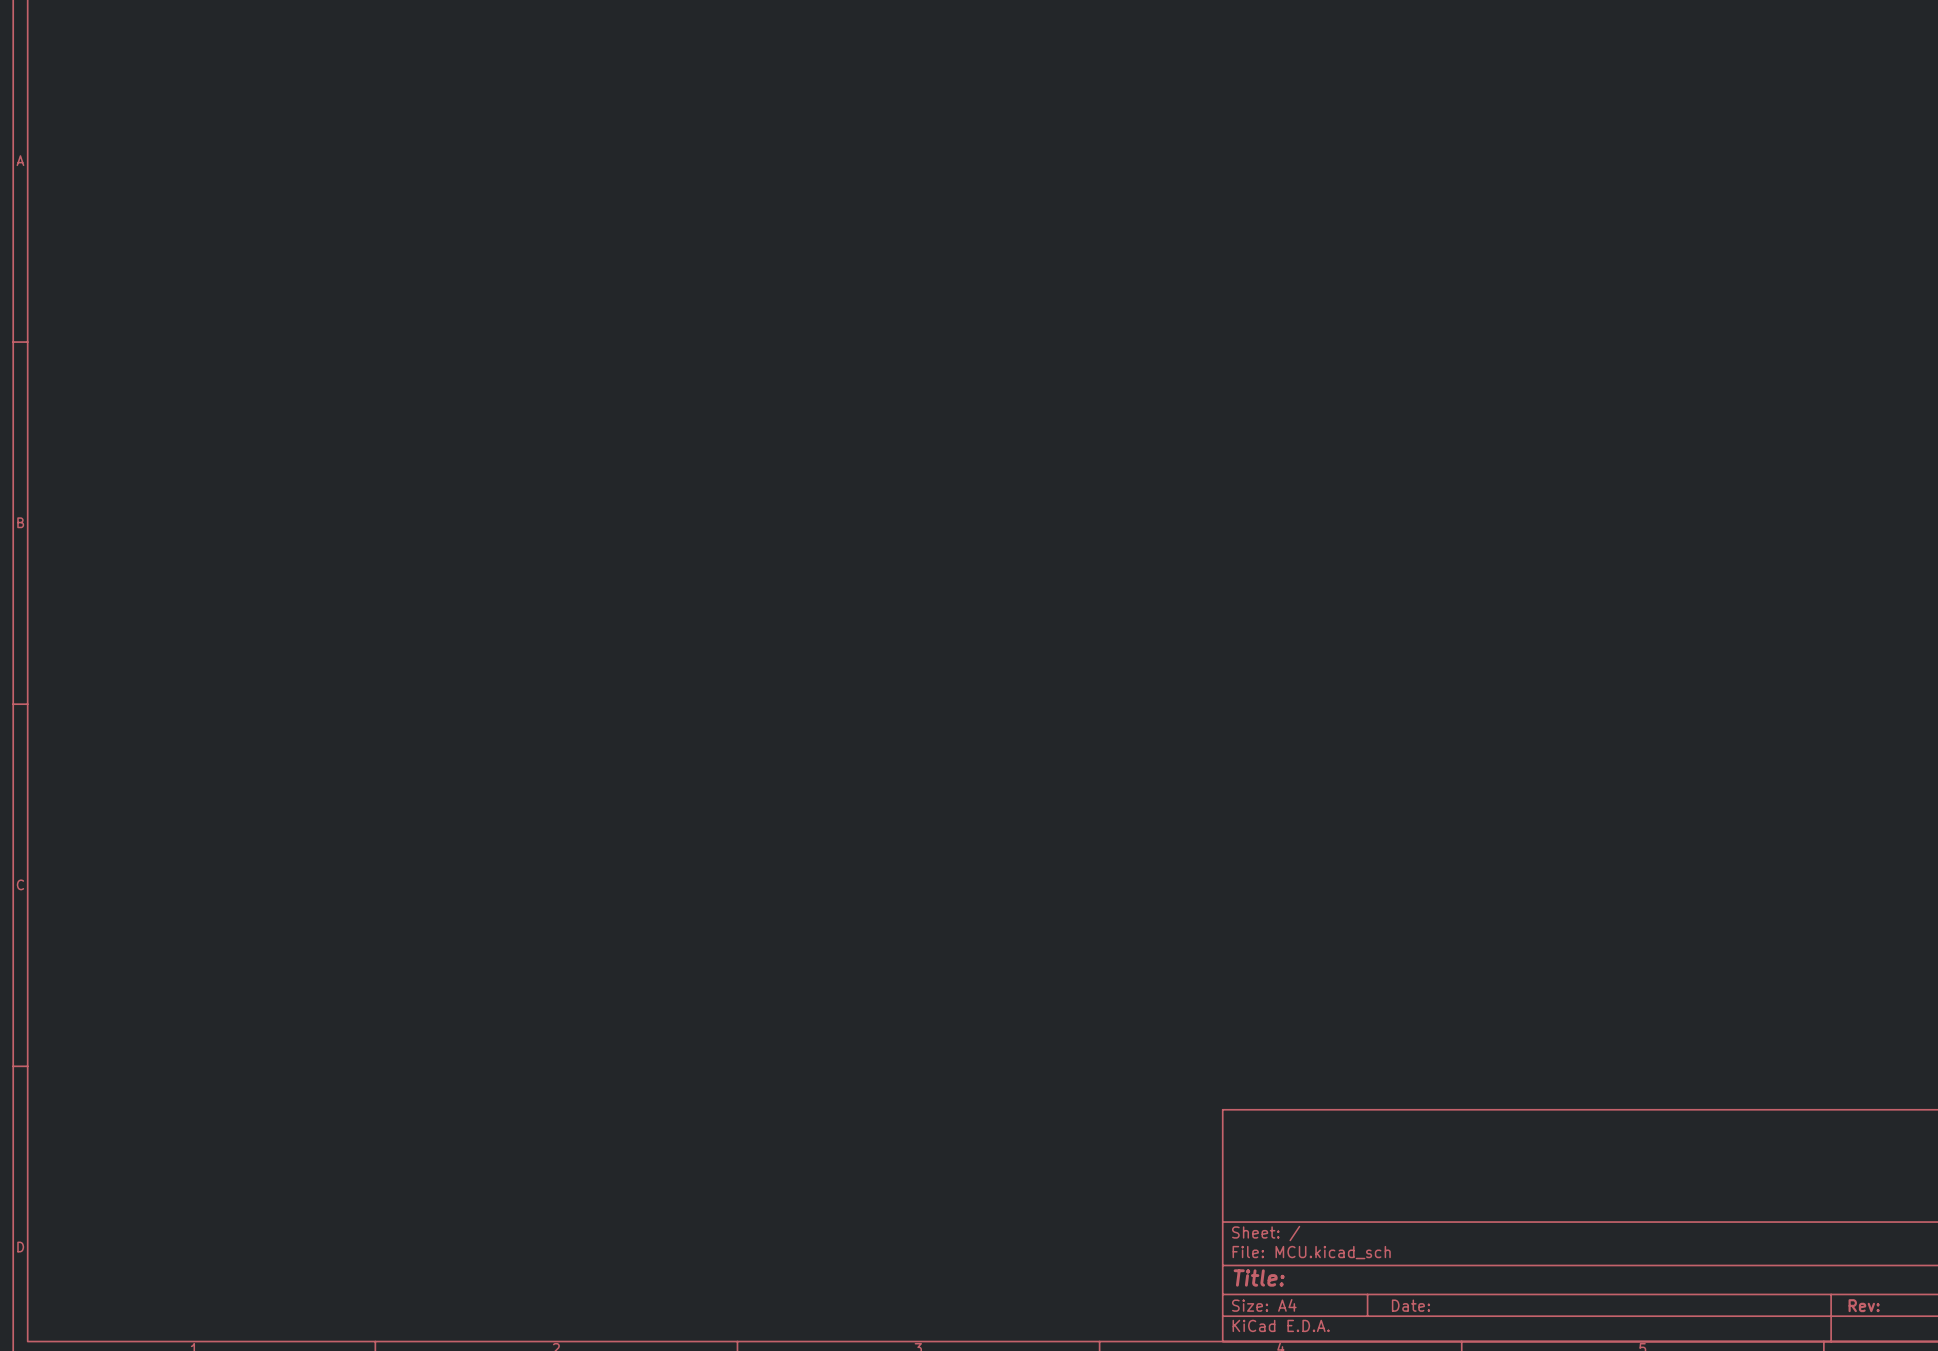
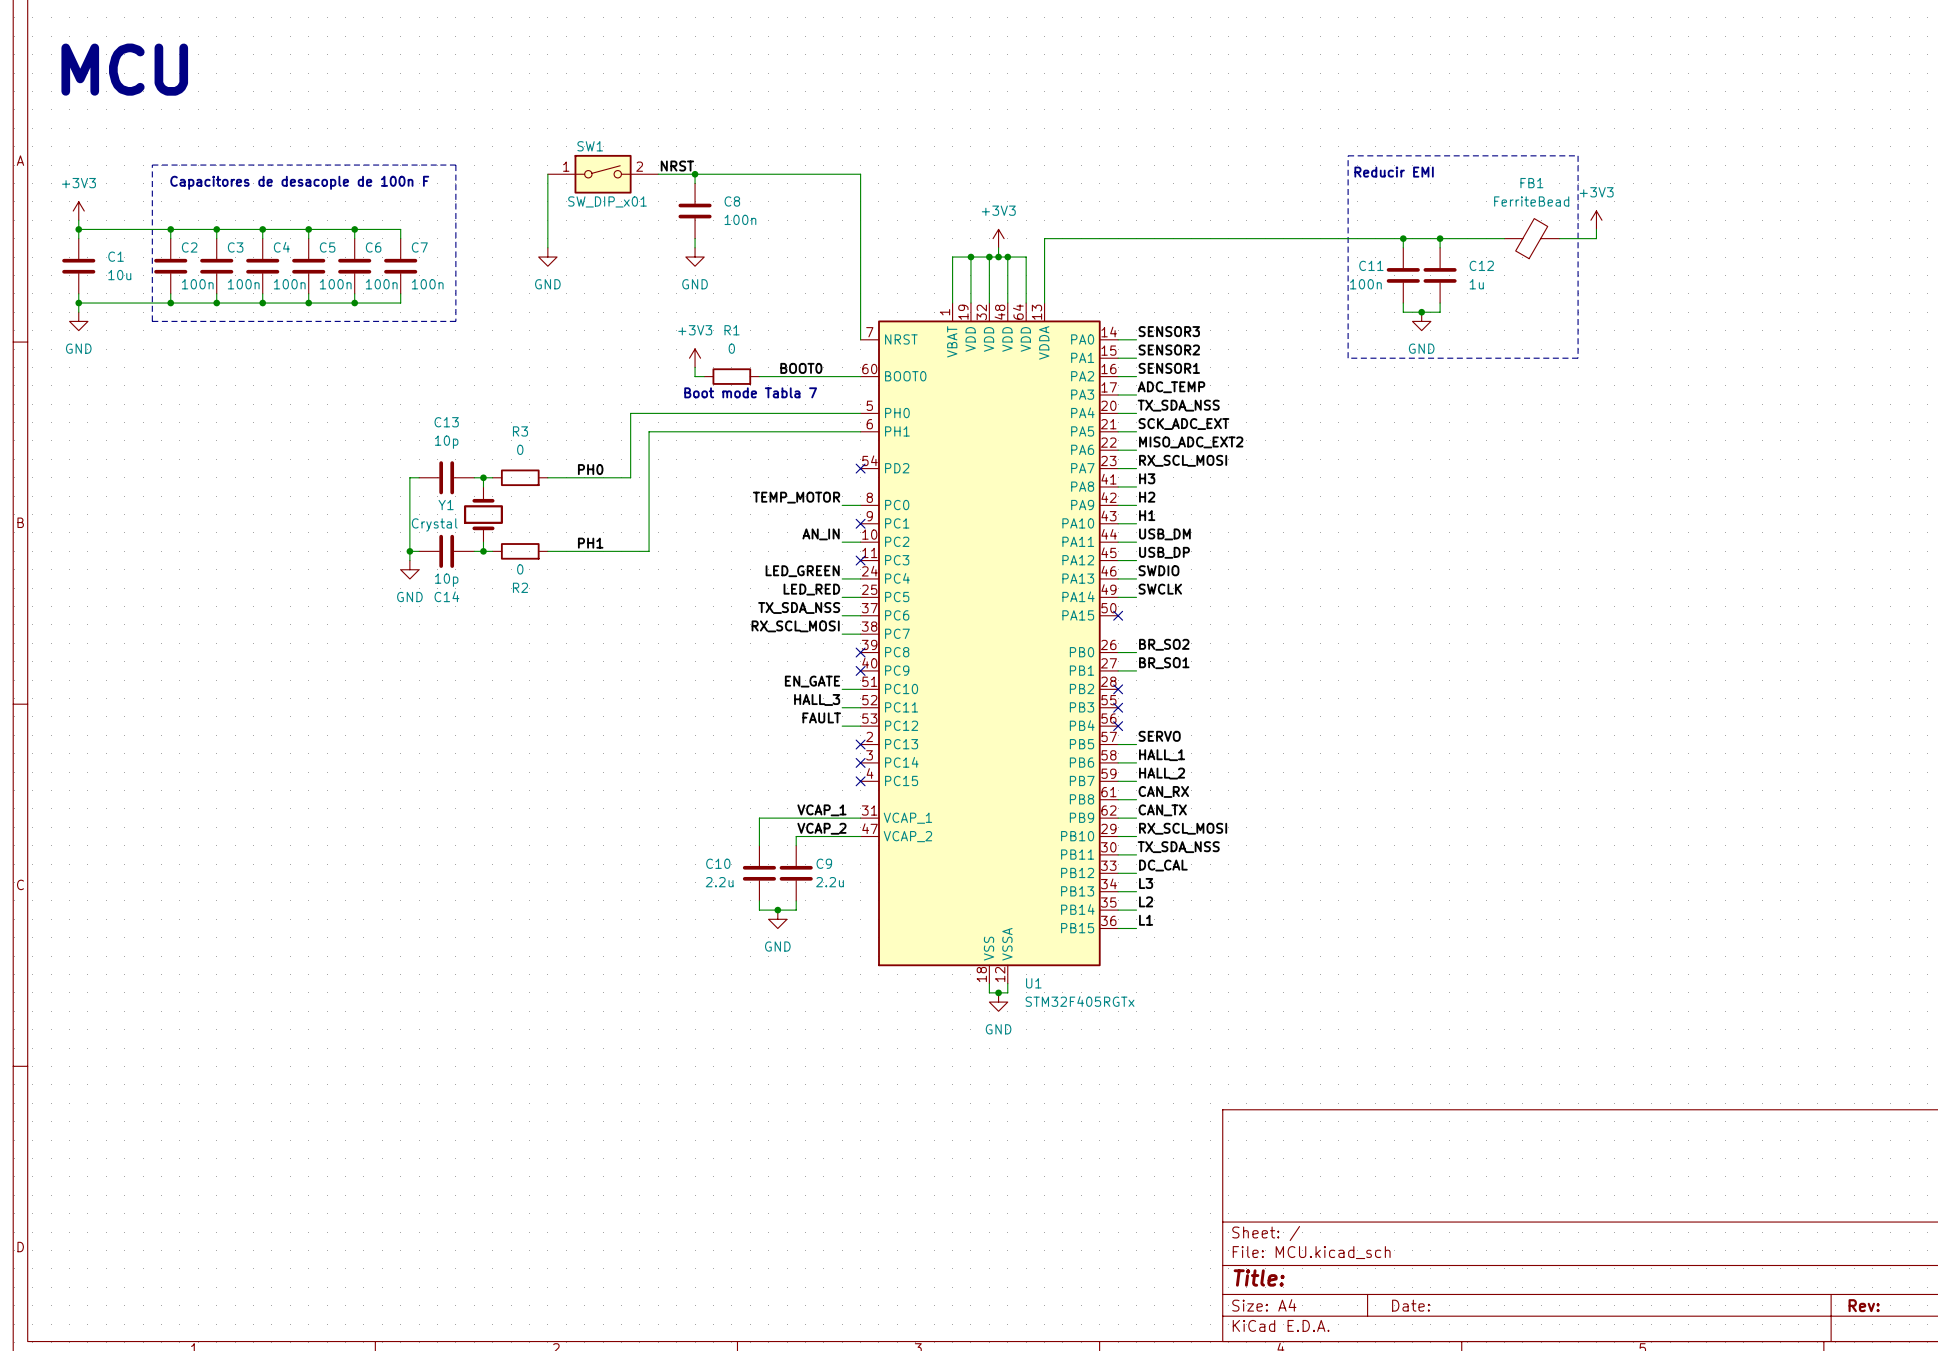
text: none -> MCU (124, 69)
line: none -> (1348, 155) (1578, 155) (1578, 358) (1348, 358) (1348, 155)
line: none -> (152, 165) (455, 165) (455, 321) (152, 321) (152, 165)
label: none -> NRST (677, 166)
text: none -> Reducir EMI (1394, 172)
wire: none -> (547, 174) (547, 247)
SW1: none -> SW_DIP_x01 (603, 174)
wire: none -> (658, 174) (860, 174) (860, 339)
wire: none -> (695, 174) (695, 183)
junction: none -> (695, 174)
text: none -> Capacitores de desacople de 100n F (299, 182)
power symbol: none -> +3V3 (78, 211)
C8: none -> 100n (695, 211)
wire: none -> (78, 220) (78, 238)
power symbol: none -> +3V3 (1596, 220)
wire: none -> (78, 229) (400, 229) (400, 238)
junction: none -> (78, 229)
wire: none -> (170, 229) (170, 238)
junction: none -> (170, 229)
wire: none -> (216, 229) (216, 238)
junction: none -> (216, 229)
wire: none -> (262, 229) (262, 238)
junction: none -> (262, 229)
wire: none -> (308, 229) (308, 238)
junction: none -> (308, 229)
wire: none -> (354, 229) (354, 238)
junction: none -> (354, 229)
wire: none -> (1596, 229) (1596, 238) (1559, 238)
wire: none -> (695, 238) (695, 247)
power symbol: none -> +3V3 (998, 238)
wire: none -> (1403, 238) (1403, 247)
junction: none -> (1403, 238)
wire: none -> (1440, 238) (1440, 247)
junction: none -> (1440, 238)
wire: none -> (1504, 238) (1044, 238) (1044, 303)
FB1: none -> FerriteBead (1532, 238)
wire: none -> (998, 247) (998, 257)
power symbol: none -> GND (547, 257)
power symbol: none -> GND (695, 257)
wire: none -> (970, 257) (970, 303)
junction: none -> (970, 257)
wire: none -> (989, 257) (989, 303)
junction: none -> (989, 257)
junction: none -> (998, 257)
wire: none -> (1007, 257) (1007, 303)
junction: none -> (1007, 257)
C1: none -> 10u (78, 266)
C2: none -> 100n (170, 266)
C3: none -> 100n (216, 266)
C4: none -> 100n (262, 266)
C5: none -> 100n (308, 266)
C6: none -> 100n (354, 266)
C7: none -> 100n (400, 266)
C11: none -> 100n (1403, 275)
C12: none -> 1u (1440, 275)
wire: none -> (78, 293) (78, 312)
wire: none -> (170, 293) (170, 303)
wire: none -> (216, 293) (216, 303)
wire: none -> (262, 293) (262, 303)
wire: none -> (308, 293) (308, 303)
wire: none -> (354, 293) (354, 303)
wire: none -> (400, 293) (400, 303) (78, 303)
junction: none -> (78, 303)
junction: none -> (170, 303)
junction: none -> (216, 303)
junction: none -> (262, 303)
junction: none -> (308, 303)
junction: none -> (354, 303)
wire: none -> (952, 303) (952, 257) (1026, 257) (1026, 303)
wire: none -> (1403, 303) (1403, 312) (1440, 312) (1440, 303)
junction: none -> (1421, 312)
power symbol: none -> GND (78, 321)
power symbol: none -> GND (1421, 321)
label: none -> SENSOR3 (1169, 331)
wire: none -> (1118, 339) (1136, 339)
label: none -> SENSOR2 (1169, 349)
power symbol: none -> +3V3 (695, 358)
wire: none -> (1118, 358) (1136, 358)
wire: none -> (695, 367) (695, 376) (704, 376)
label: none -> BOOT0 (801, 368)
label: none -> SENSOR1 (1169, 368)
R1: none -> 0 (731, 376)
wire: none -> (759, 376) (860, 376)
wire: none -> (1118, 376) (1136, 376)
label: none -> ADC_TEMP (1171, 387)
text: none -> Boot mode Tabla 7 (750, 392)
wire: none -> (1118, 395) (1136, 395)
label: none -> TX_SDA_NSS (1178, 405)
wire: none -> (860, 413) (630, 413) (630, 477) (547, 477)
wire: none -> (1118, 413) (1136, 413)
label: none -> SCK_ADC_EXT (1183, 424)
wire: none -> (860, 431) (649, 431) (649, 551) (547, 551)
wire: none -> (1118, 431) (1136, 431)
label: none -> MISO_ADC_EXT2 (1191, 442)
wire: none -> (1118, 450) (1136, 450)
label: none -> RX_SCL_MOSI (1183, 460)
no-connect mark: none -> (860, 468)
wire: none -> (1118, 468) (1136, 468)
label: none -> PH0 (590, 469)
wire: none -> (419, 477) (409, 477) (409, 560)
C13: none -> 10p (446, 477)
wire: none -> (474, 477) (492, 477)
wire: none -> (483, 477) (483, 486)
junction: none -> (483, 477)
R3: none -> 0 (520, 477)
label: none -> H3 (1147, 478)
wire: none -> (1118, 486) (1136, 486)
label: none -> TEMP_MOTOR (796, 497)
label: none -> H2 (1147, 497)
wire: none -> (842, 505) (860, 505)
wire: none -> (1118, 505) (1136, 505)
Y1: none -> Crystal (483, 514)
label: none -> H1 (1147, 515)
no-connect mark: none -> (860, 523)
wire: none -> (1118, 523) (1136, 523)
label: none -> AN_IN (821, 534)
label: none -> USB_DM (1164, 534)
wire: none -> (483, 542) (483, 551)
wire: none -> (842, 542) (860, 542)
wire: none -> (1118, 542) (1136, 542)
label: none -> PH1 (590, 543)
wire: none -> (409, 551) (419, 551)
junction: none -> (409, 551)
C14: none -> 10p (446, 551)
wire: none -> (474, 551) (492, 551)
junction: none -> (483, 551)
R2: none -> 0 (520, 551)
label: none -> USB_DP (1164, 552)
no-connect mark: none -> (860, 560)
wire: none -> (1118, 560) (1136, 560)
power symbol: none -> GND (409, 569)
label: none -> SWDIO (1159, 570)
label: none -> LED_GREEN (802, 571)
wire: none -> (842, 578) (860, 578)
wire: none -> (1118, 578) (1136, 578)
label: none -> LED_RED (811, 589)
label: none -> SWCLK (1160, 589)
wire: none -> (842, 597) (860, 597)
wire: none -> (1118, 597) (1136, 597)
label: none -> TX_SDA_NSS (799, 607)
wire: none -> (842, 615) (860, 615)
no-connect mark: none -> (1118, 615)
label: none -> RX_SCL_MOSI (795, 626)
wire: none -> (842, 634) (860, 634)
U1: none -> STM32F405RGTx (989, 643)
label: none -> BR_SO2 (1164, 644)
no-connect mark: none -> (860, 652)
wire: none -> (1118, 652) (1136, 652)
label: none -> BR_SO1 (1164, 663)
no-connect mark: none -> (860, 670)
wire: none -> (1118, 670) (1136, 670)
label: none -> EN_GATE (812, 681)
wire: none -> (842, 689) (860, 689)
no-connect mark: none -> (1118, 689)
label: none -> HALL_3 (817, 699)
wire: none -> (842, 707) (860, 707)
no-connect mark: none -> (1118, 707)
label: none -> FAULT (821, 717)
wire: none -> (842, 726) (860, 726)
no-connect mark: none -> (1118, 726)
label: none -> SERVO (1159, 736)
no-connect mark: none -> (860, 744)
wire: none -> (1118, 744) (1136, 744)
label: none -> HALL_1 (1162, 755)
no-connect mark: none -> (860, 762)
wire: none -> (1118, 762) (1136, 762)
label: none -> HALL_2 (1162, 773)
no-connect mark: none -> (860, 781)
wire: none -> (1118, 781) (1136, 781)
label: none -> CAN_RX (1163, 791)
wire: none -> (1118, 799) (1136, 799)
label: none -> VCAP_1 (821, 810)
label: none -> CAN_TX (1162, 810)
wire: none -> (860, 818) (759, 818) (759, 845)
wire: none -> (1118, 818) (1136, 818)
label: none -> VCAP_2 (821, 828)
label: none -> RX_SCL_MOSI (1183, 828)
wire: none -> (860, 836) (796, 836) (796, 845)
wire: none -> (1118, 836) (1136, 836)
label: none -> TX_SDA_NSS (1178, 847)
wire: none -> (1118, 854) (1136, 854)
label: none -> DC_CAL (1163, 865)
C10: none -> 2.2u (759, 873)
C9: none -> 2.2u (796, 873)
wire: none -> (1118, 873) (1136, 873)
label: none -> L3 (1146, 883)
wire: none -> (1118, 891) (1136, 891)
wire: none -> (759, 900) (759, 910) (796, 910) (796, 900)
label: none -> L2 (1146, 901)
junction: none -> (777, 910)
wire: none -> (1118, 910) (1136, 910)
power symbol: none -> GND (777, 919)
label: none -> L1 (1146, 920)
wire: none -> (1118, 928) (1136, 928)
wire: none -> (989, 983) (989, 992) (1007, 992) (1007, 983)
junction: none -> (998, 992)
power symbol: none -> GND (998, 1002)

